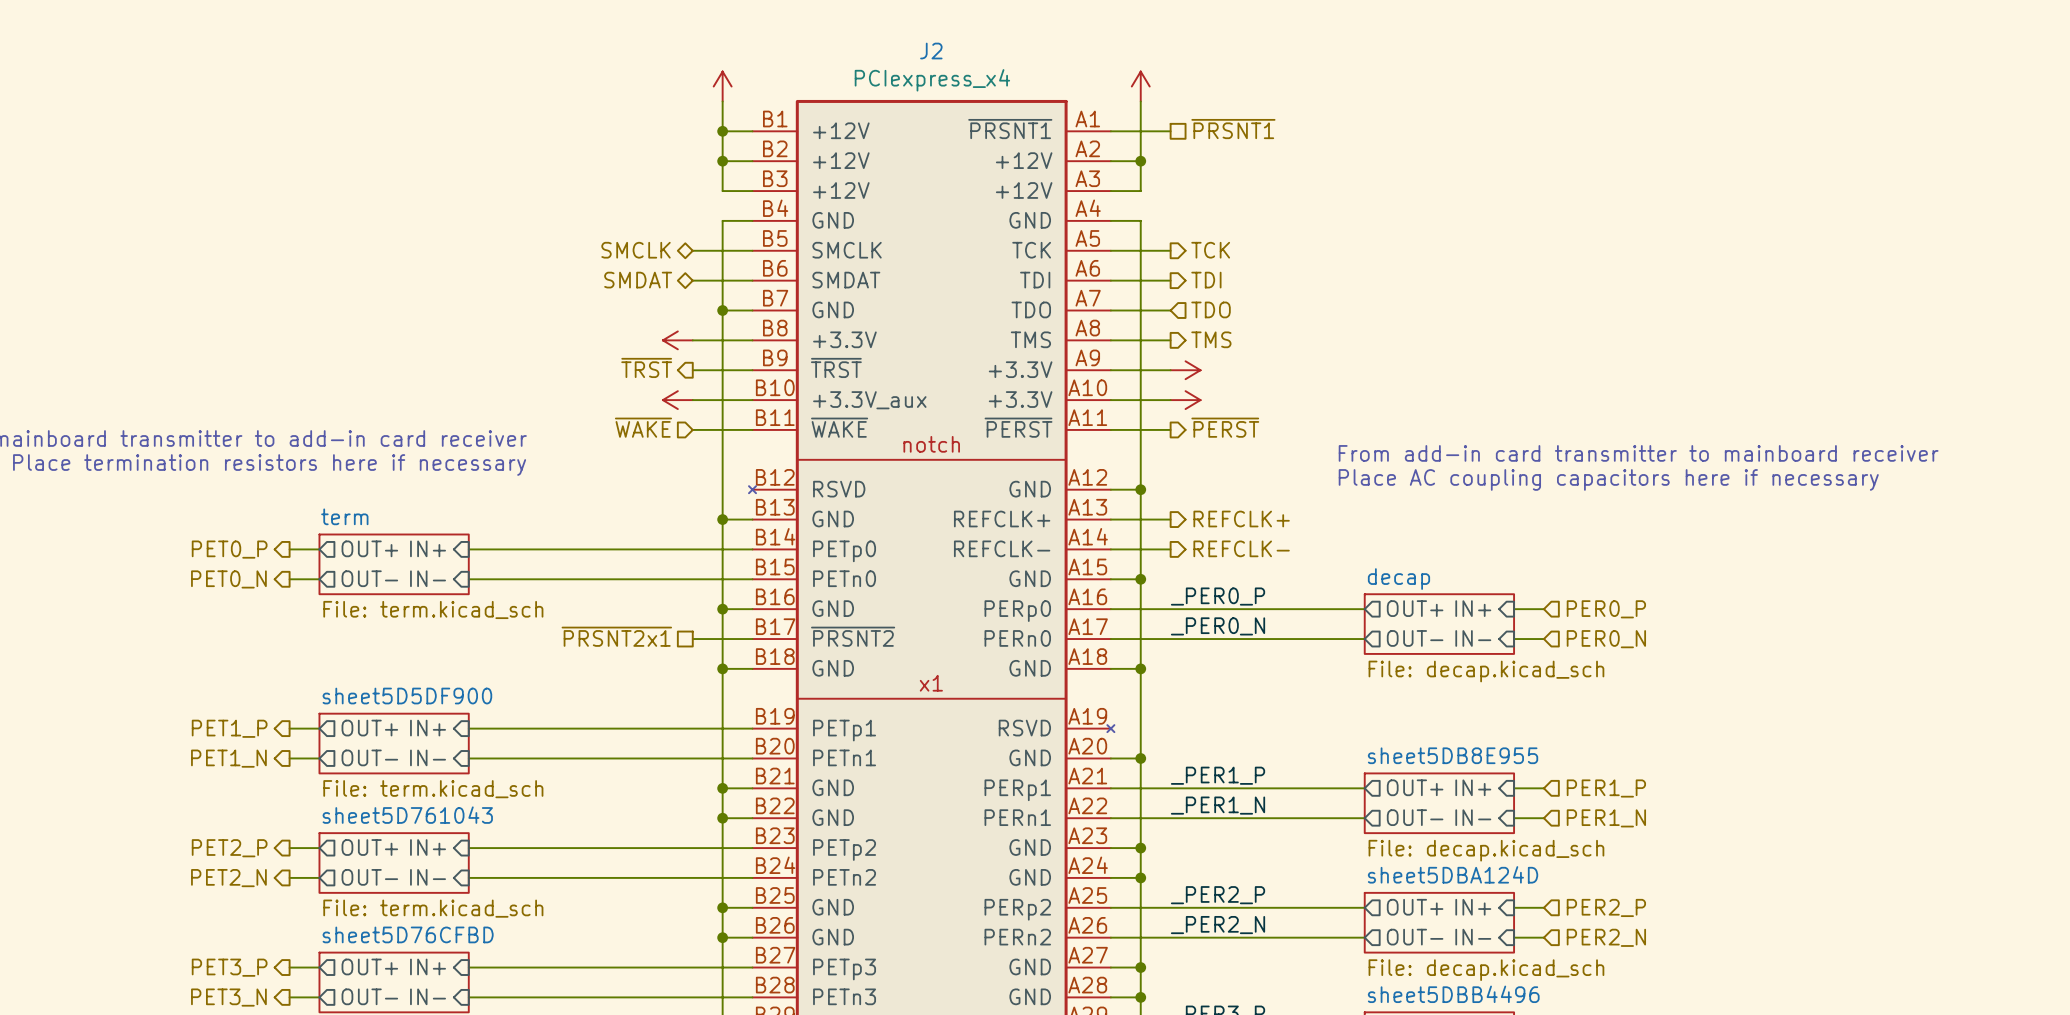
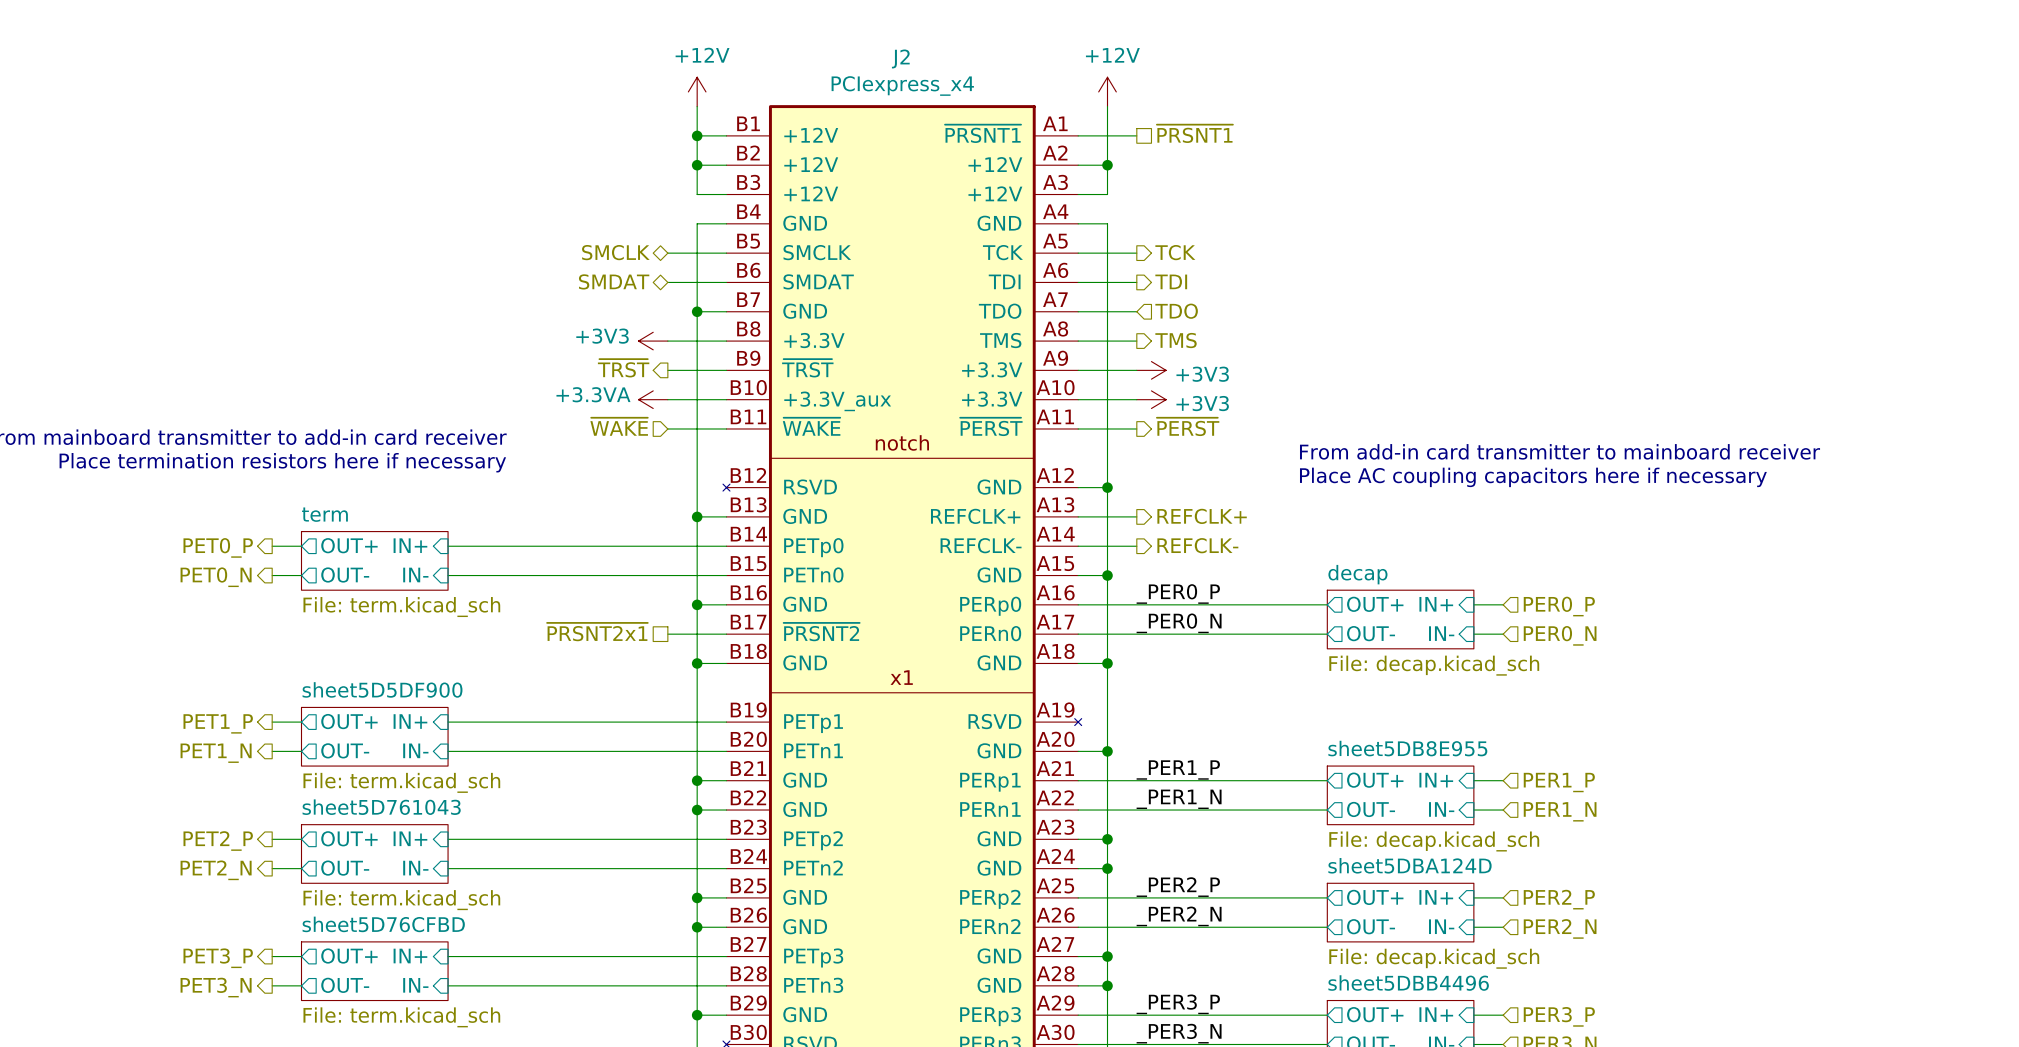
power symbol text: none -> +12V (702, 55)
power symbol text: none -> +12V (1112, 55)
power symbol text: none -> +3V3 (602, 336)
power symbol text: none -> +3V3 (1202, 374)
power symbol text: none -> +3.3VA (593, 394)
power symbol text: none -> +3V3 (1202, 403)

